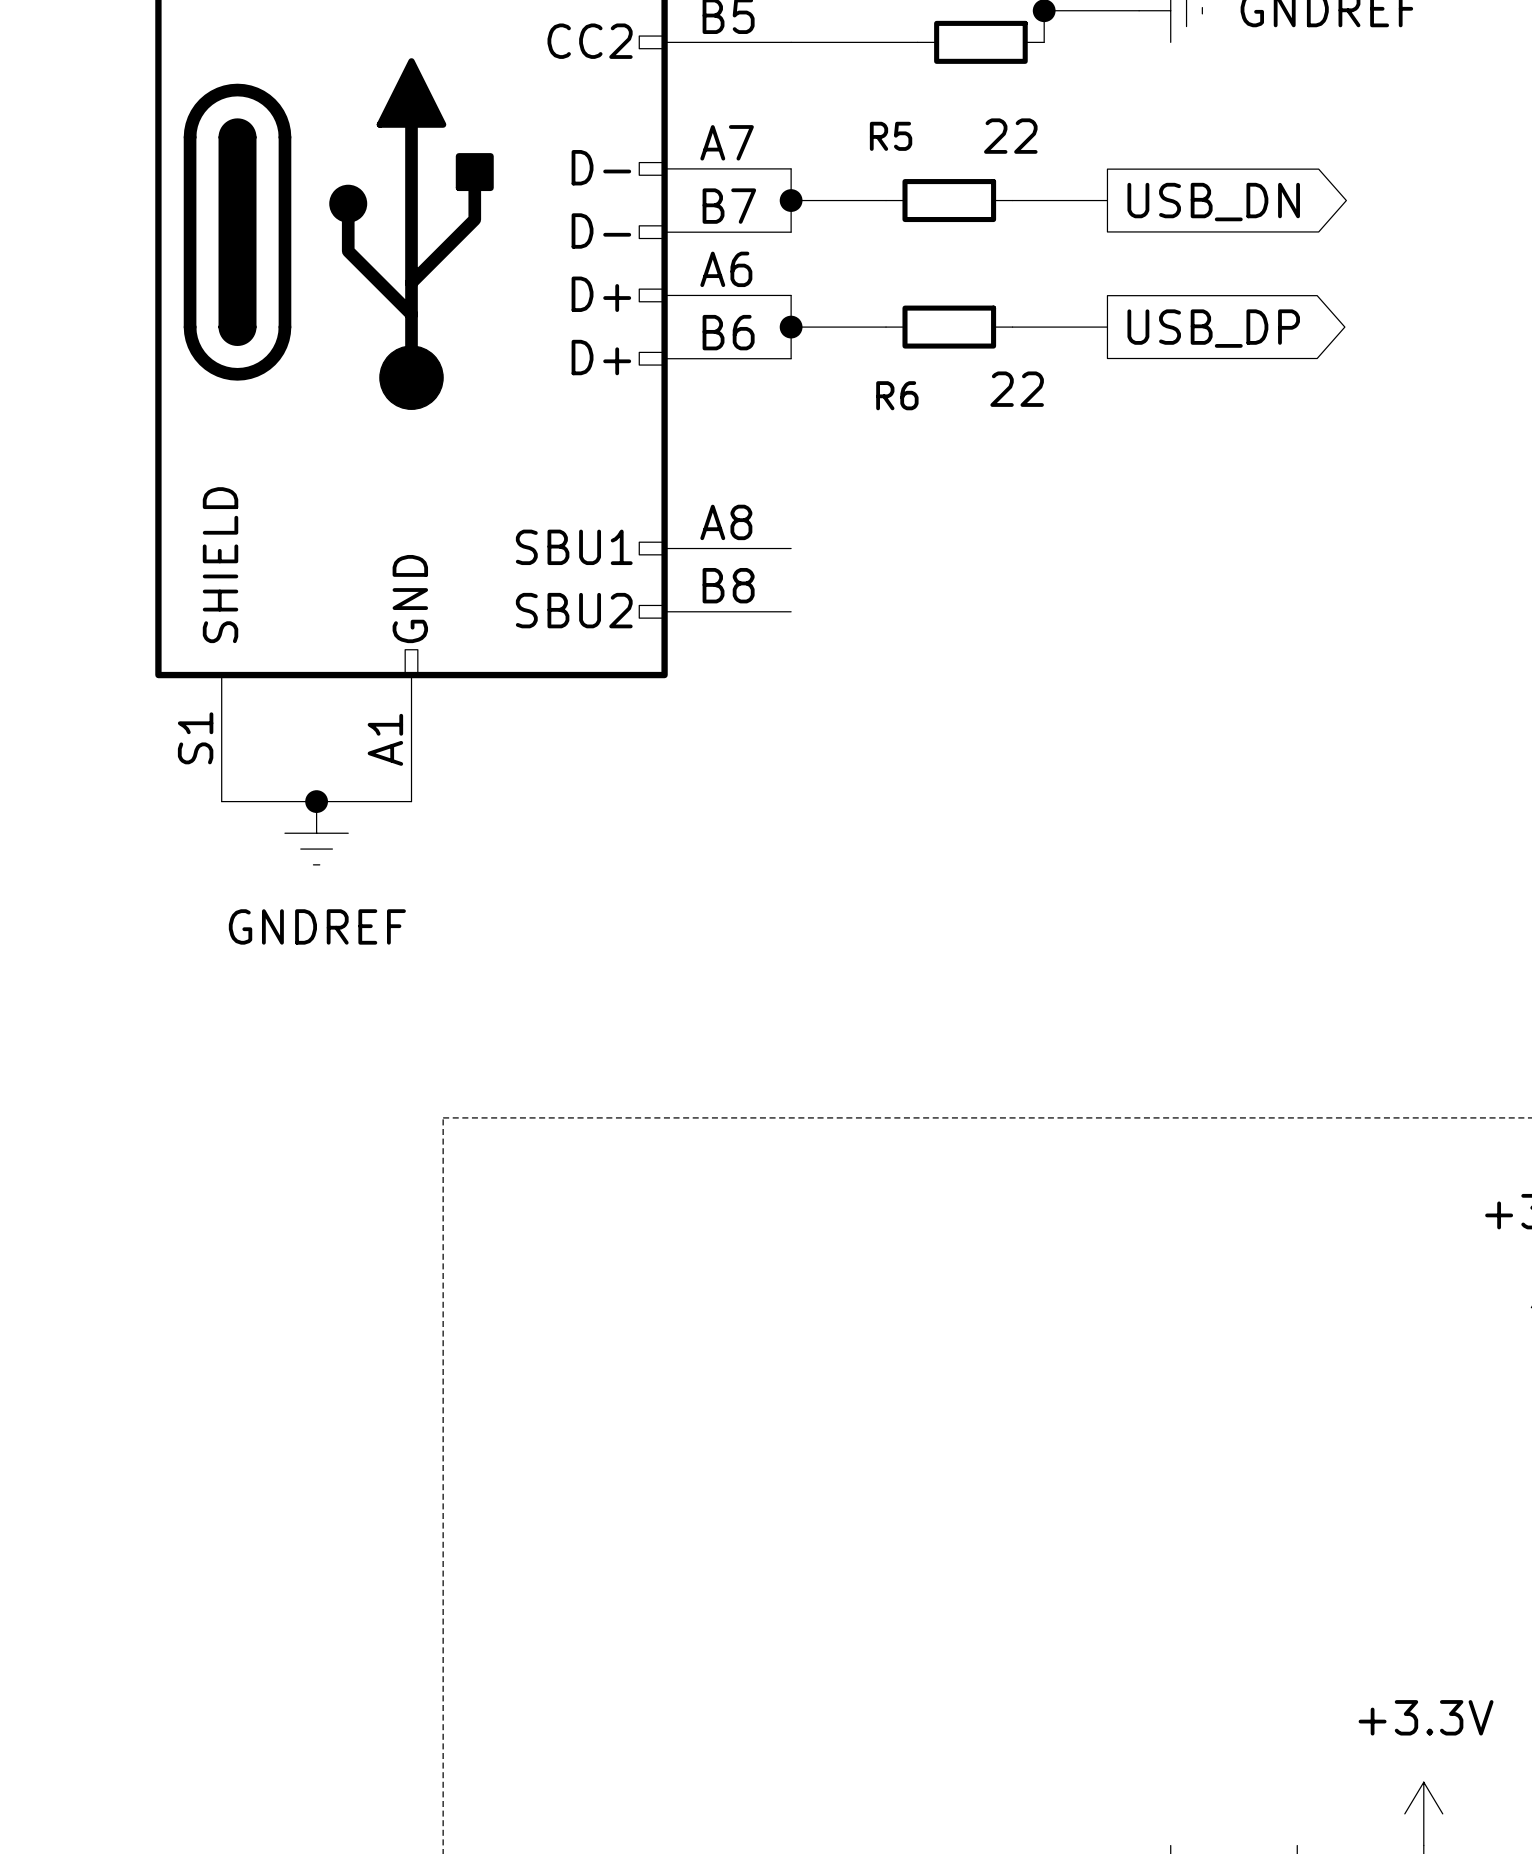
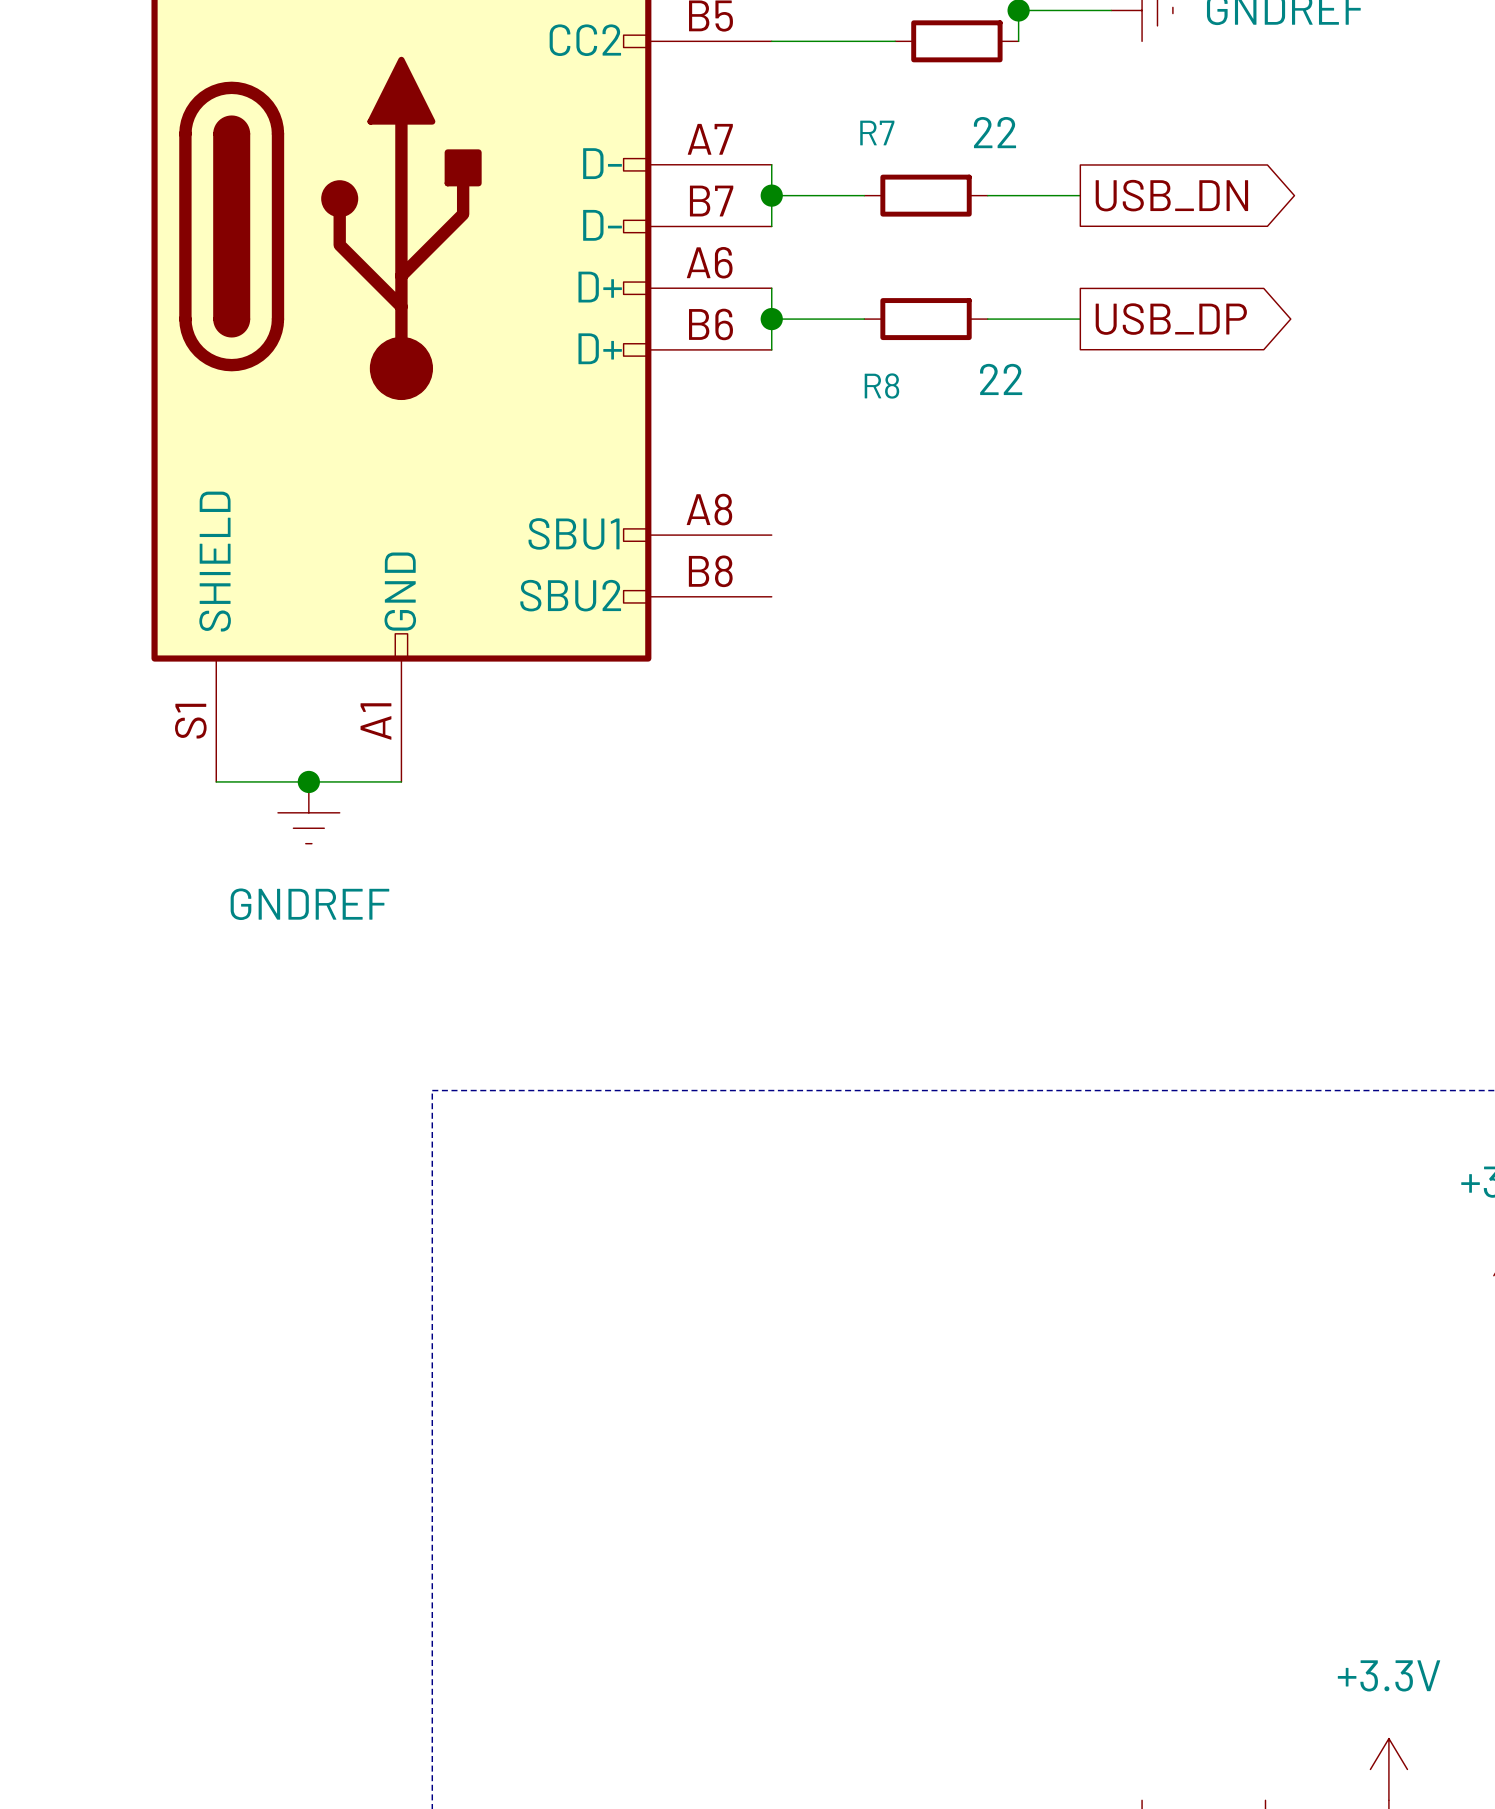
R5 name: R5 (891, 136) -> R7 (877, 132)
R6 name: R6 (897, 395) -> R8 (881, 386)

